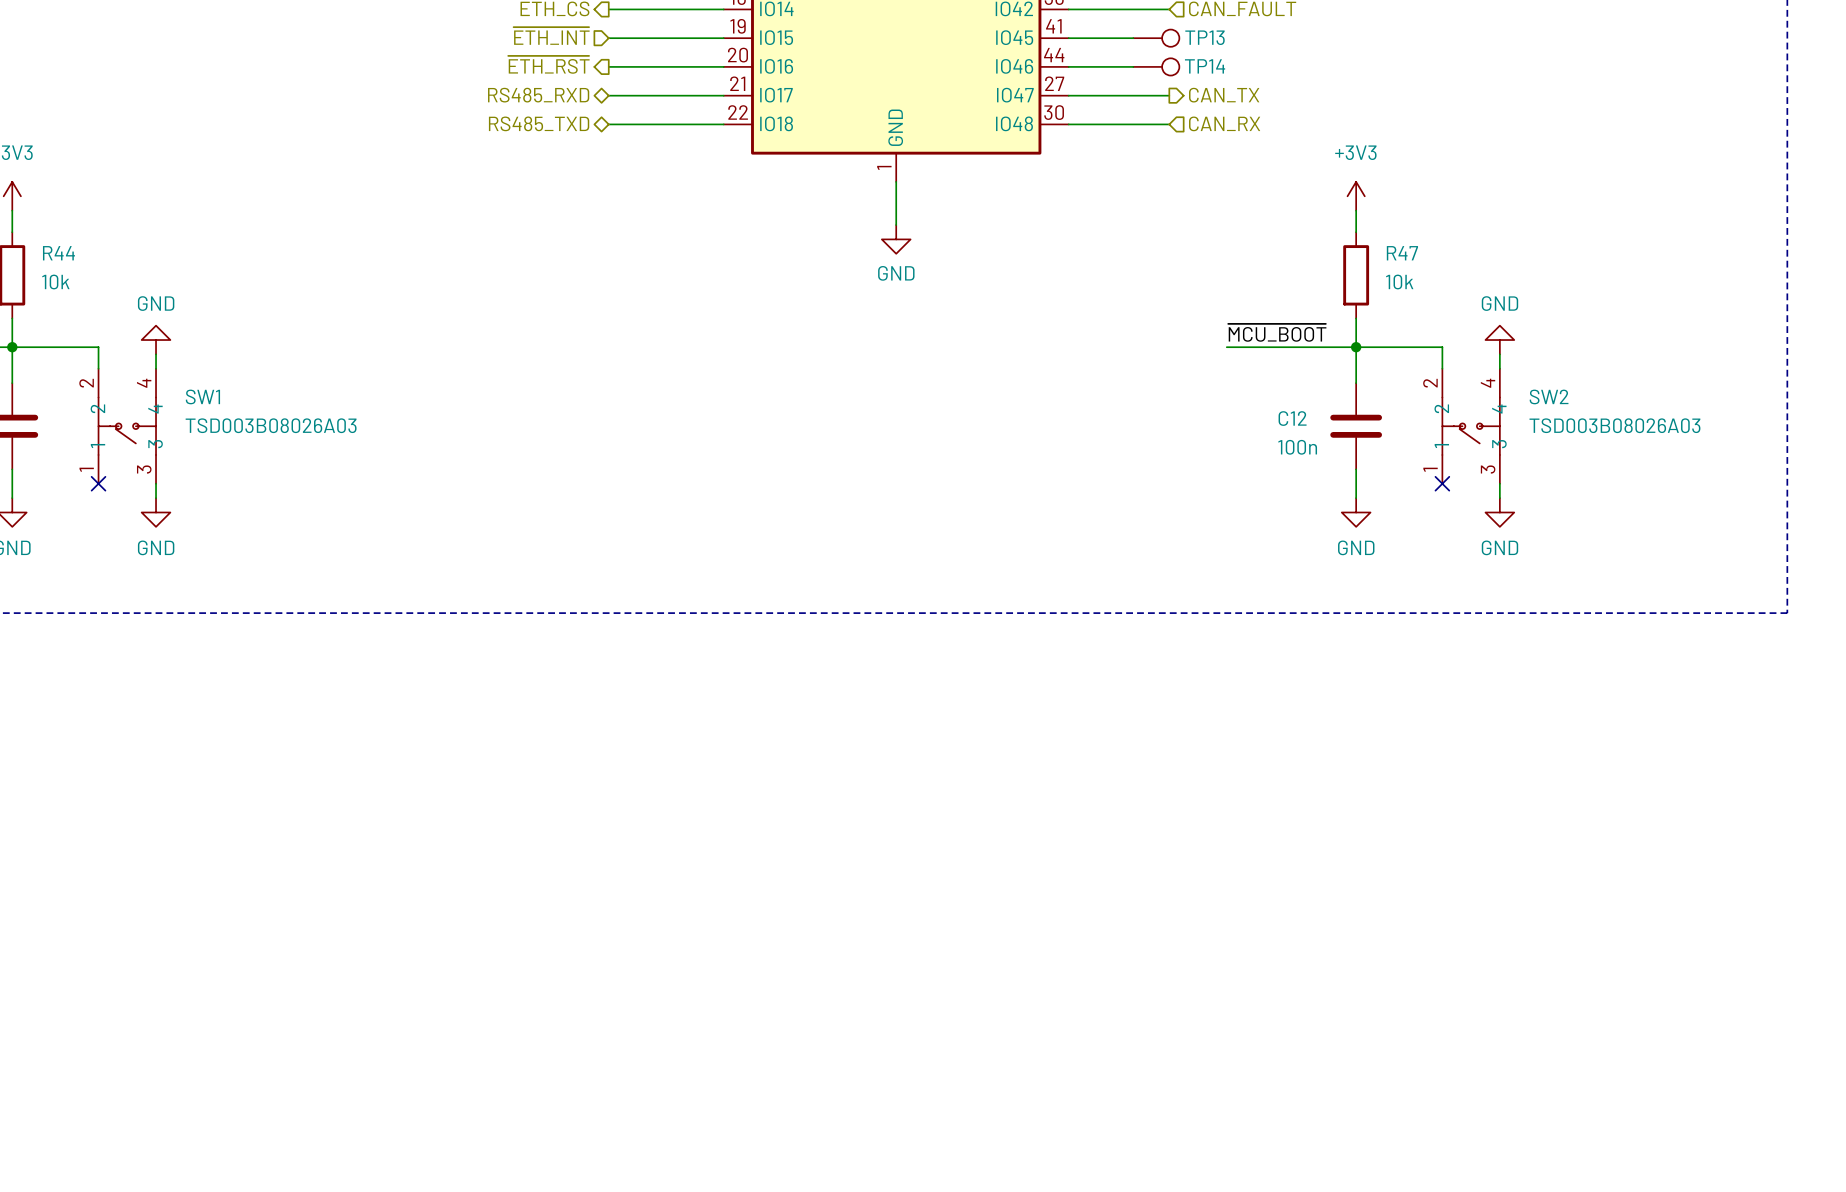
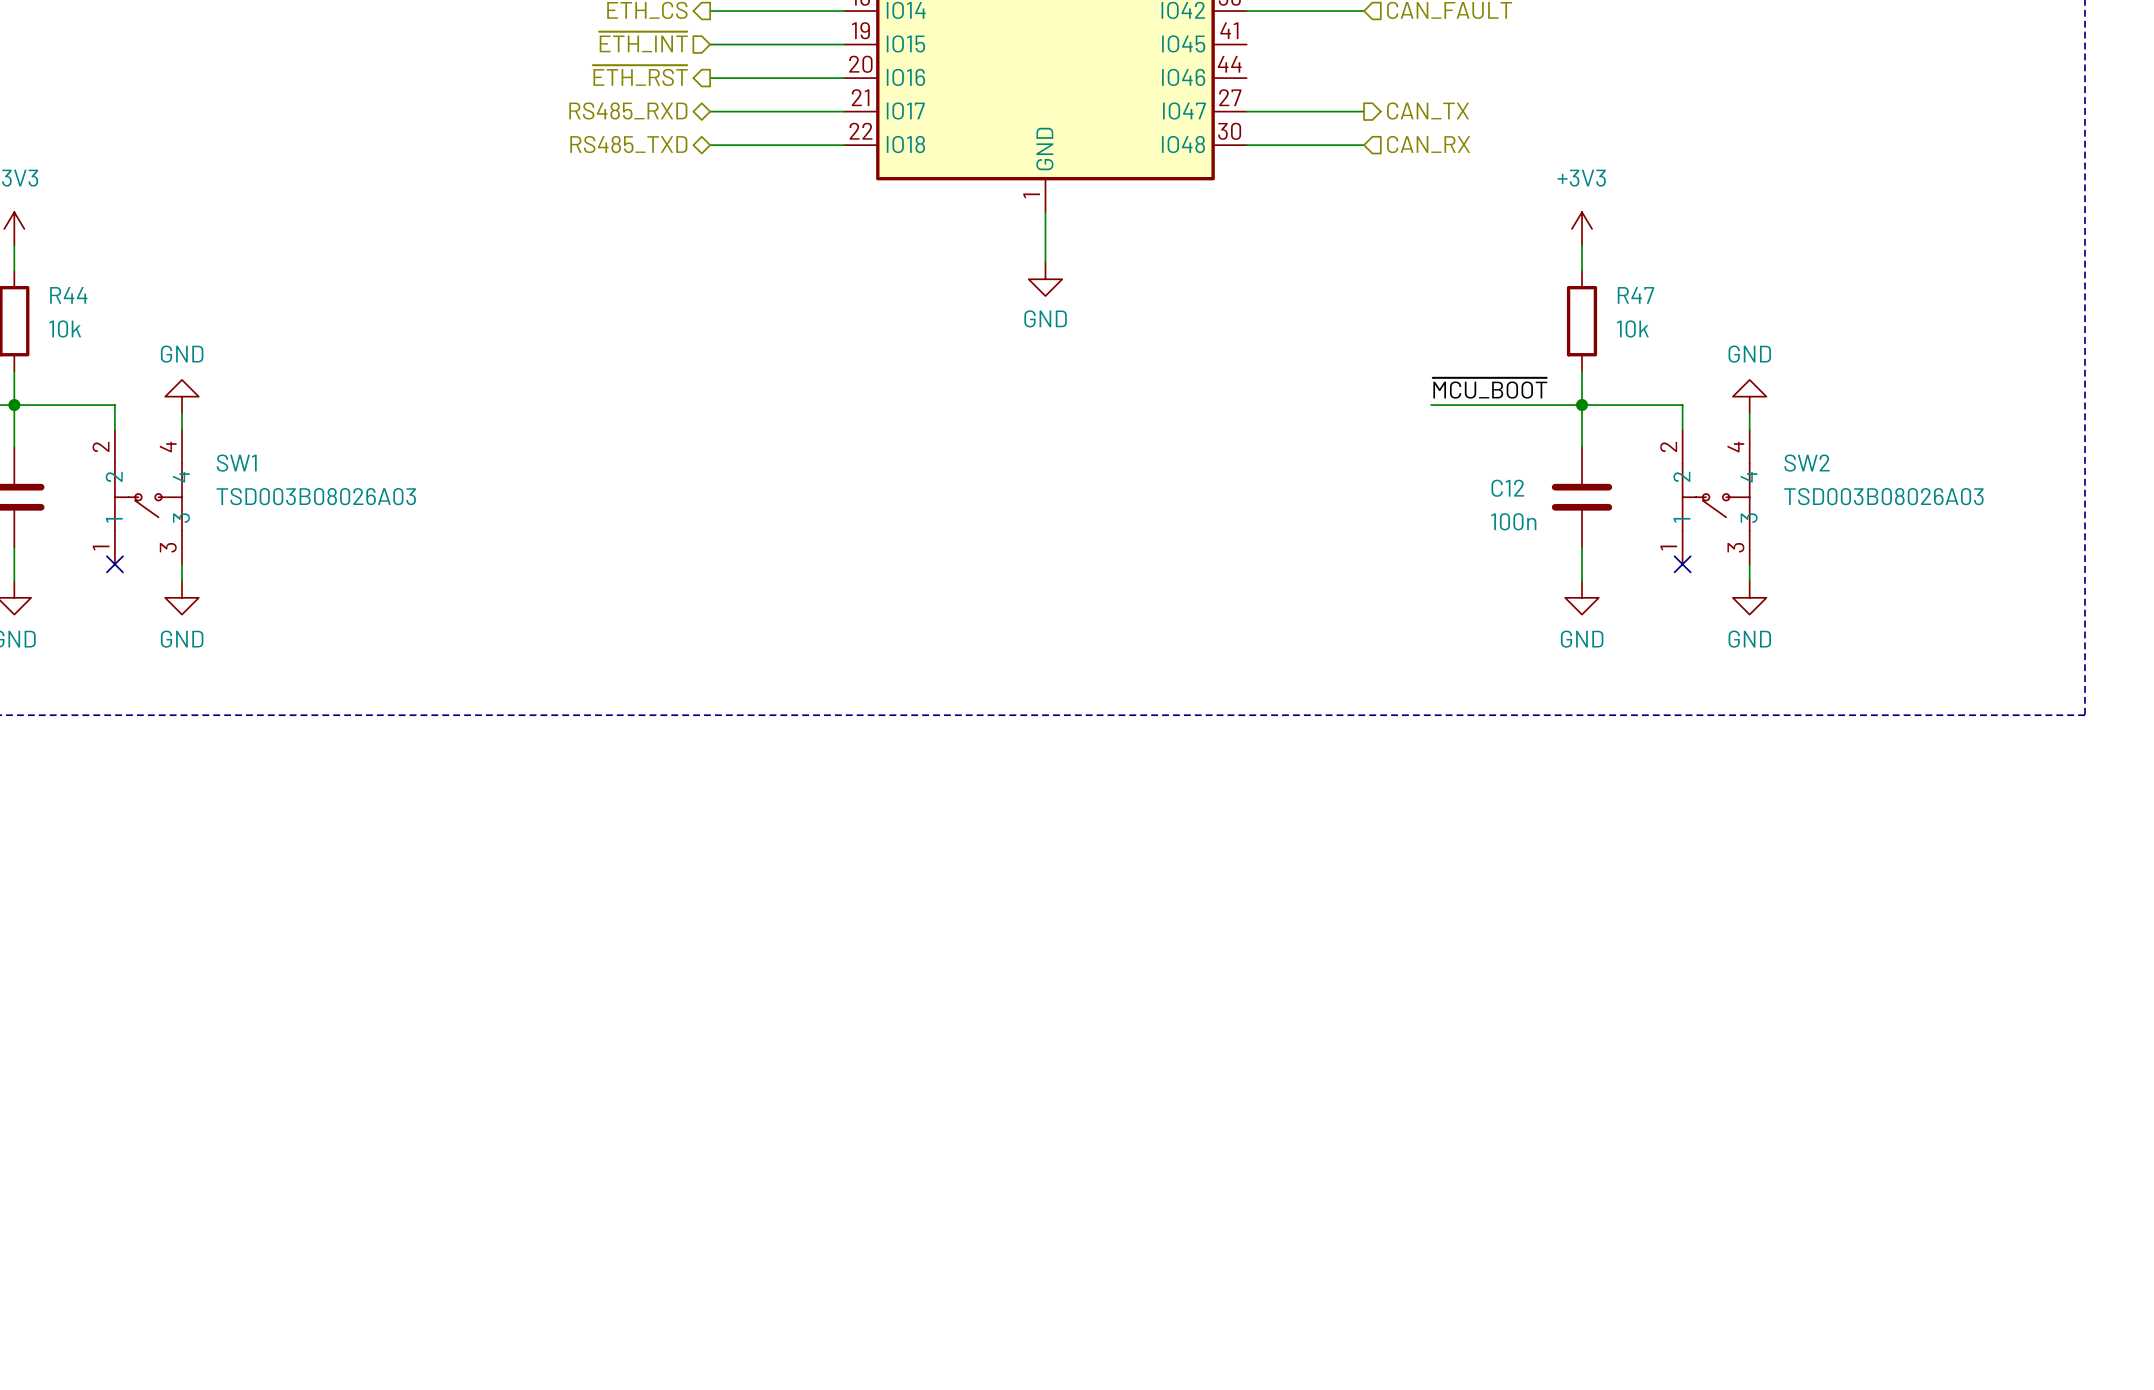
wire: (1068, 38) (1133, 38) -> none
TP13: (1156, 38) -> none
wire: (1068, 66) (1133, 66) -> none
TP14: (1156, 66) -> none

